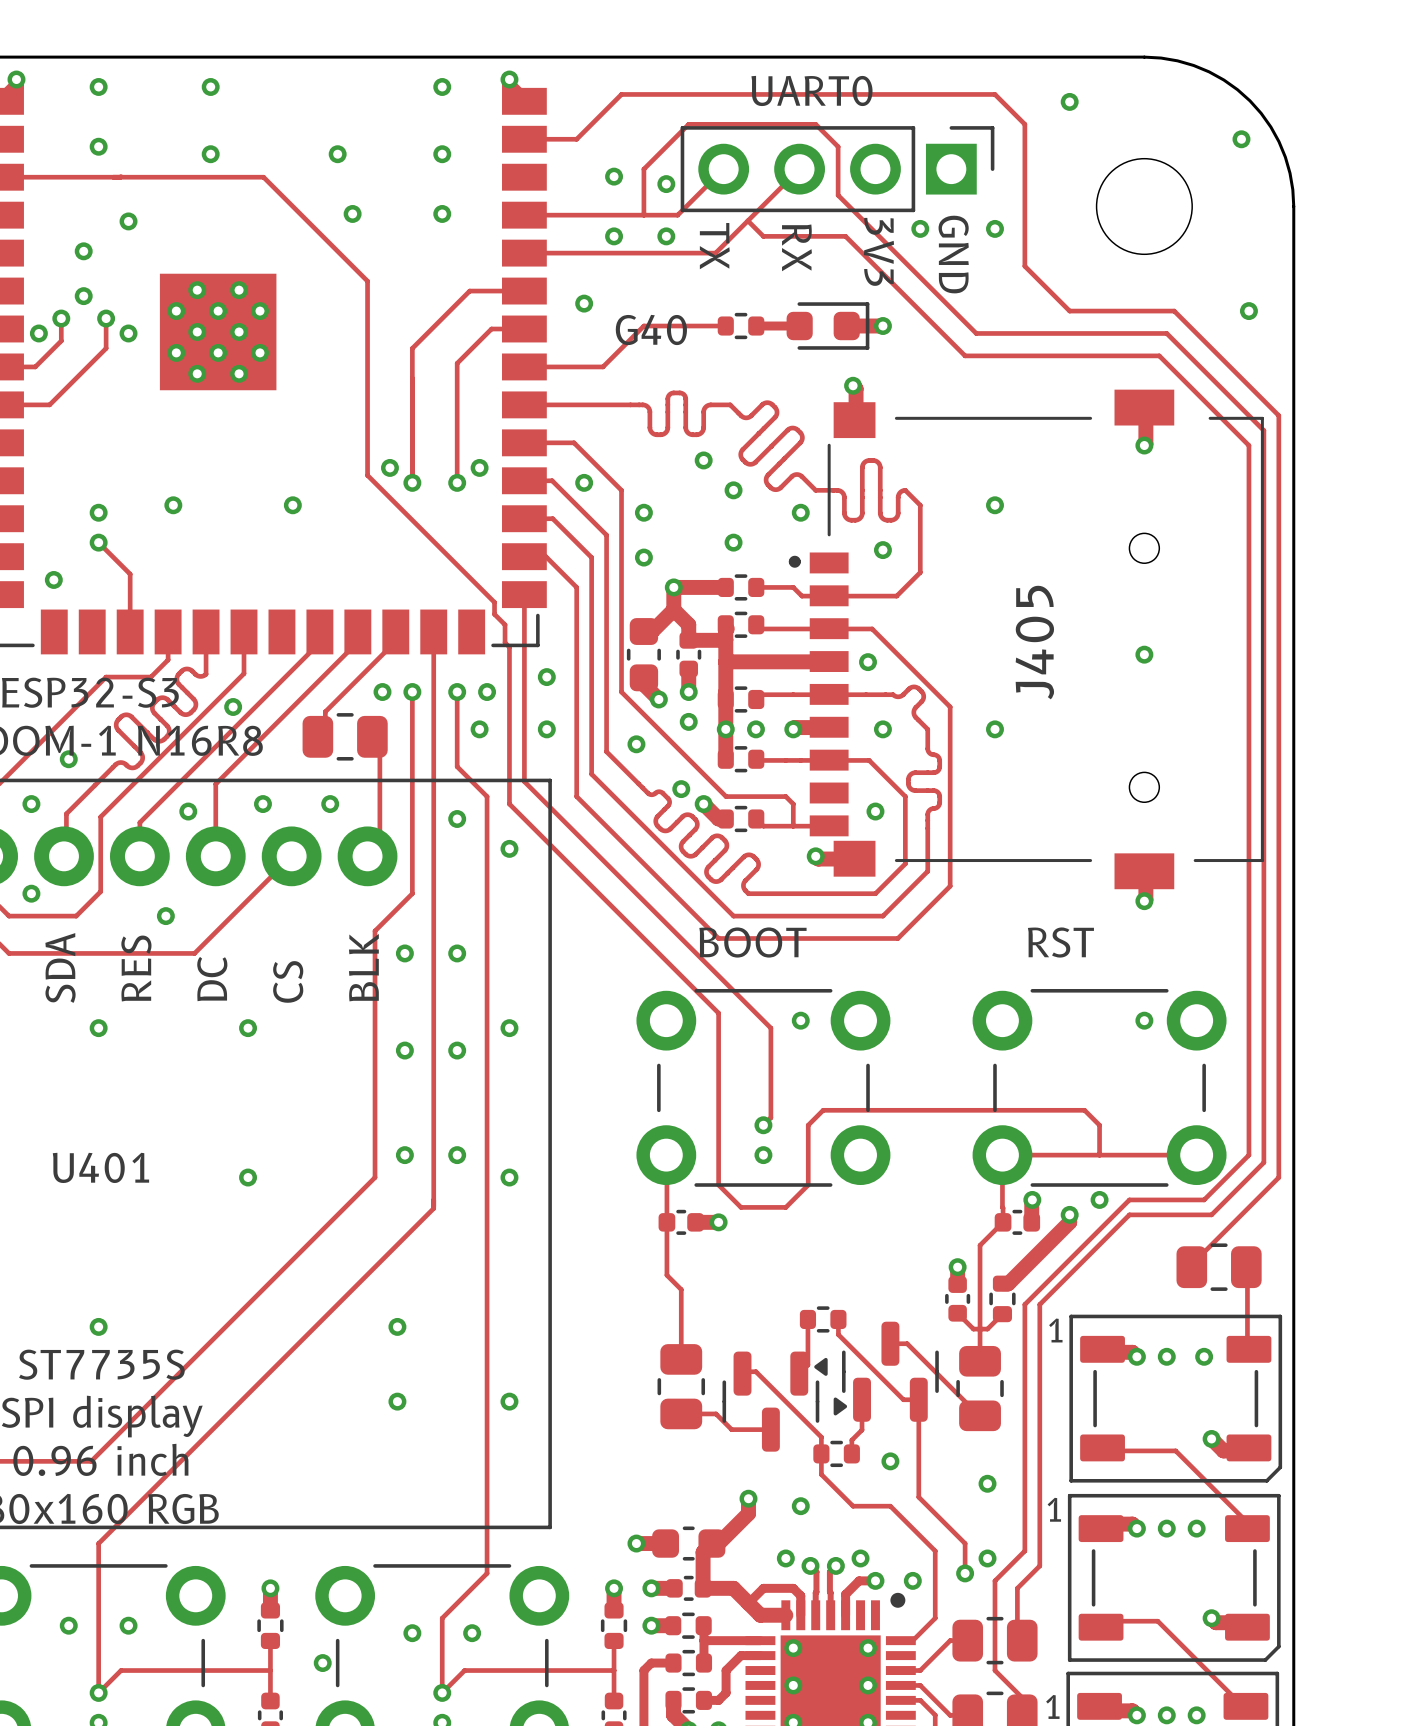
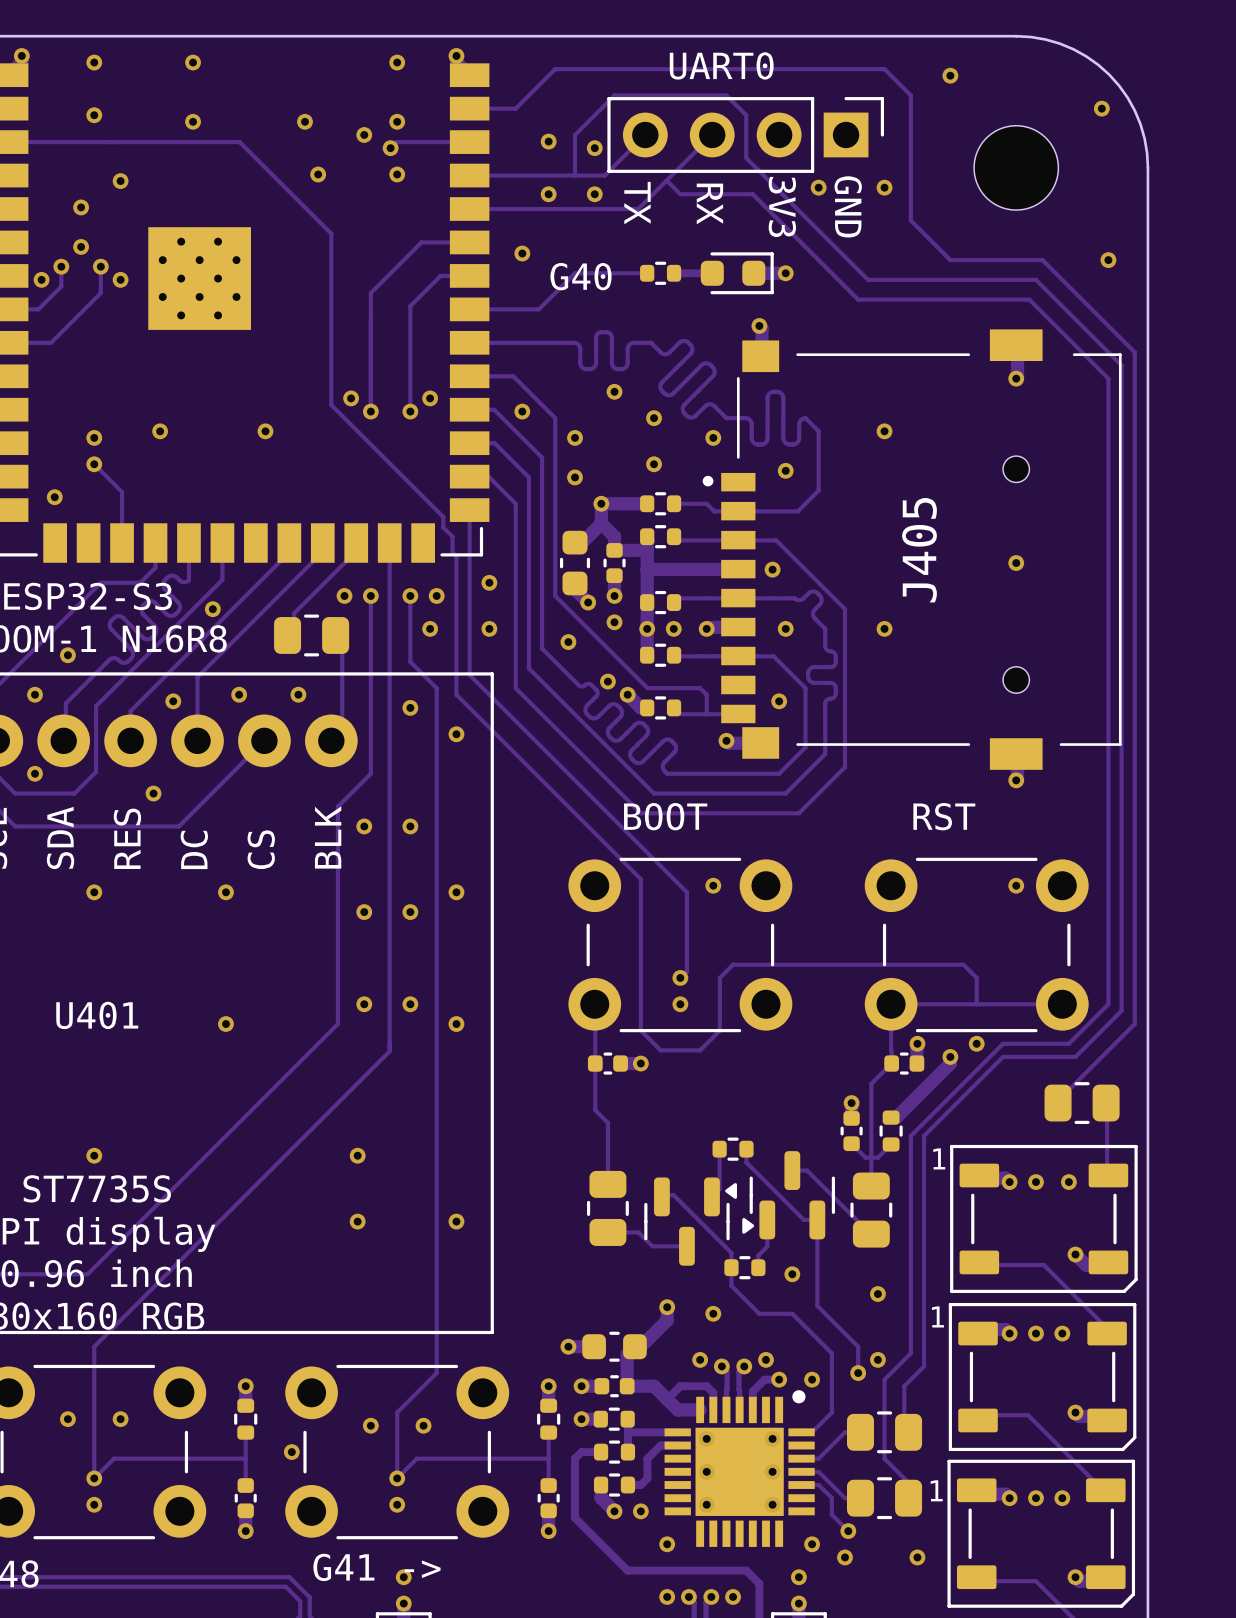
via: none -> (364, 134)
track: none -> (469, 142) (396, 142) (390, 148)
via: none -> (390, 148)
via position: (703, 460) -> (614, 391)

